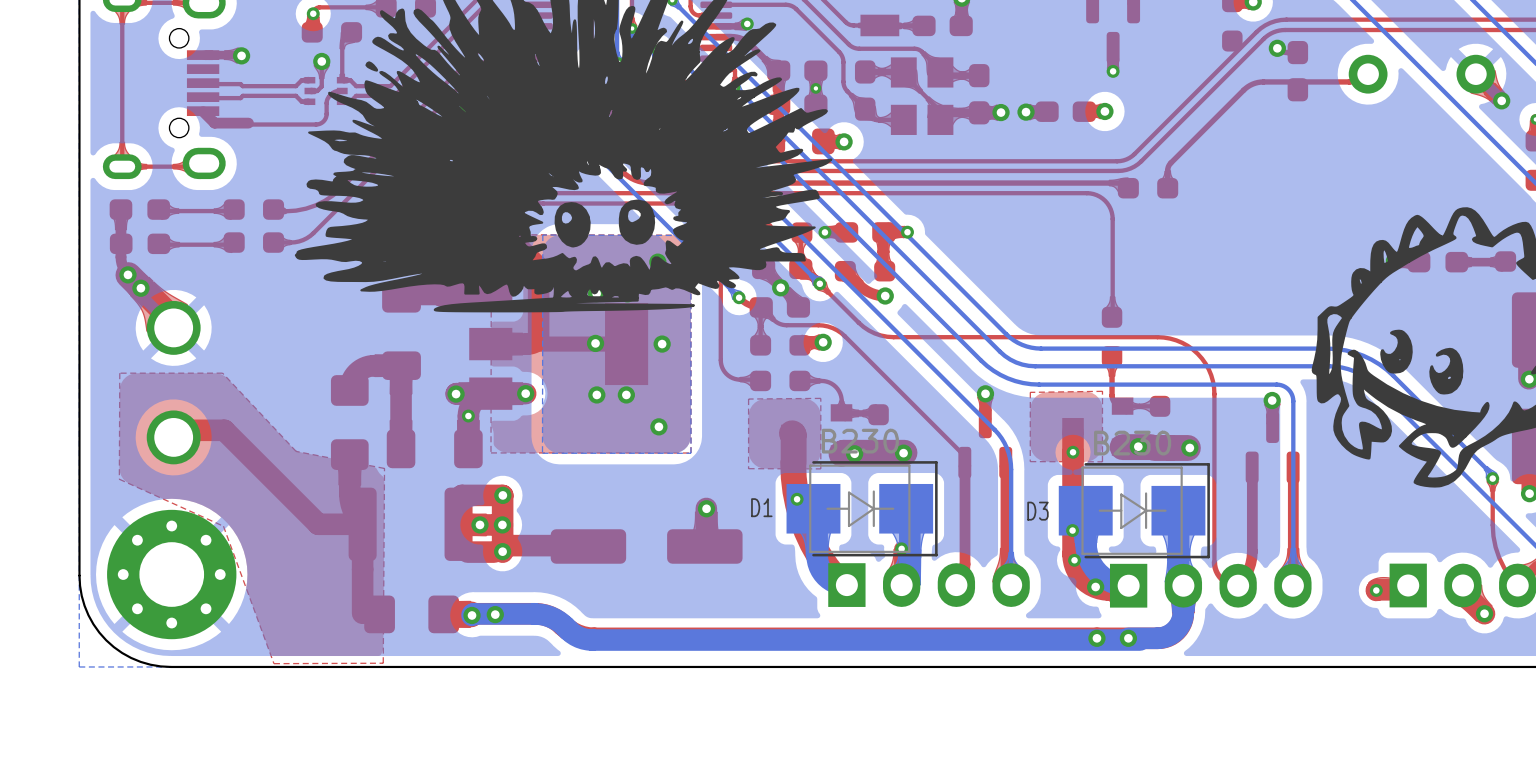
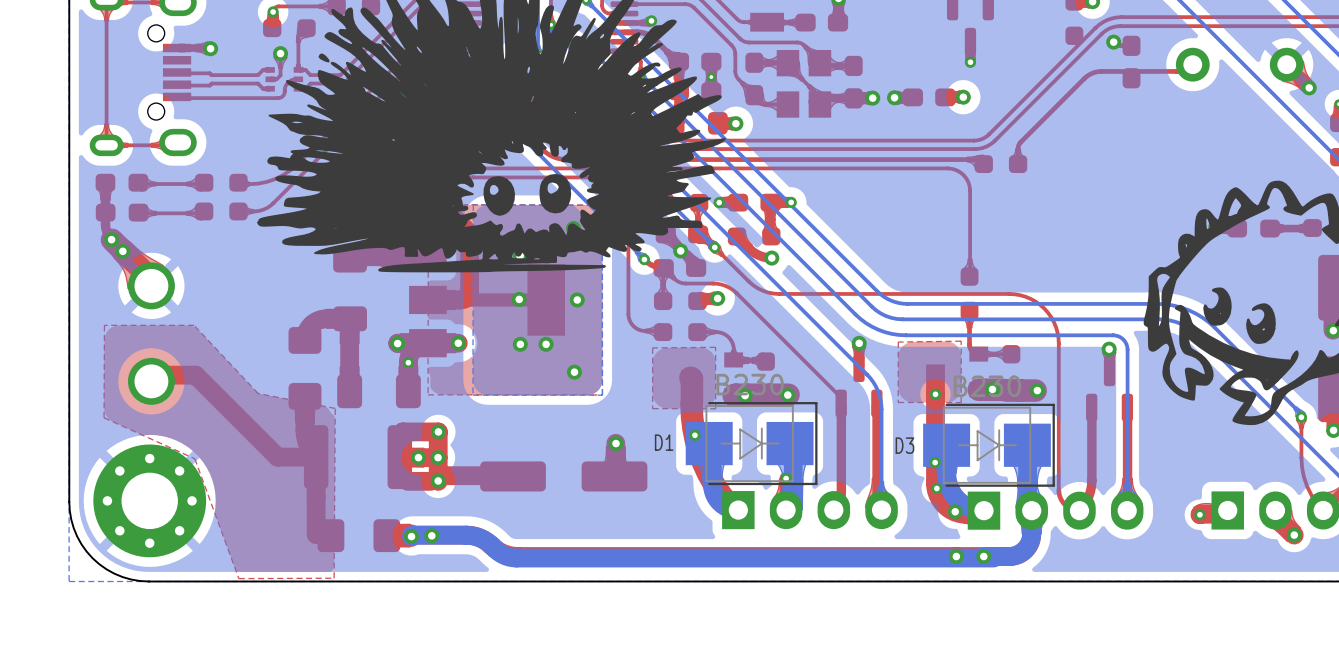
top track: (326, 104) (325, 118) (318, 124) (252, 124) -> (284, 91) (282, 96) (278, 98) (177, 96)
top track: (203, 111) (214, 123) (248, 123) -> none

